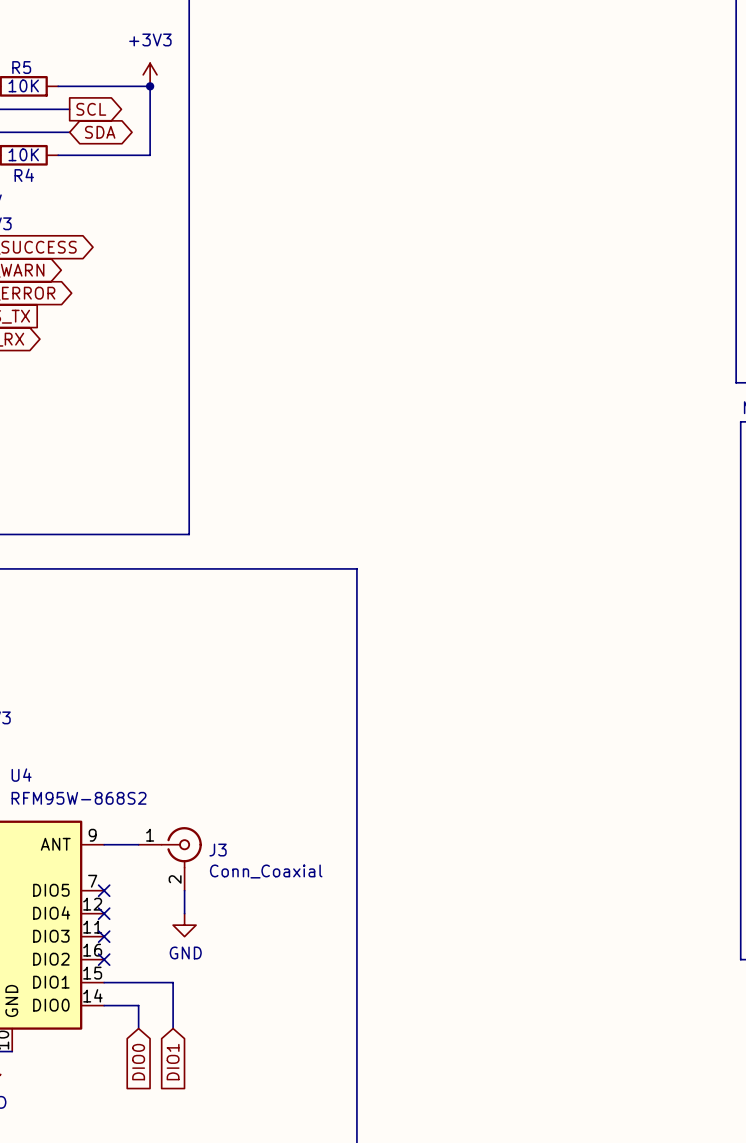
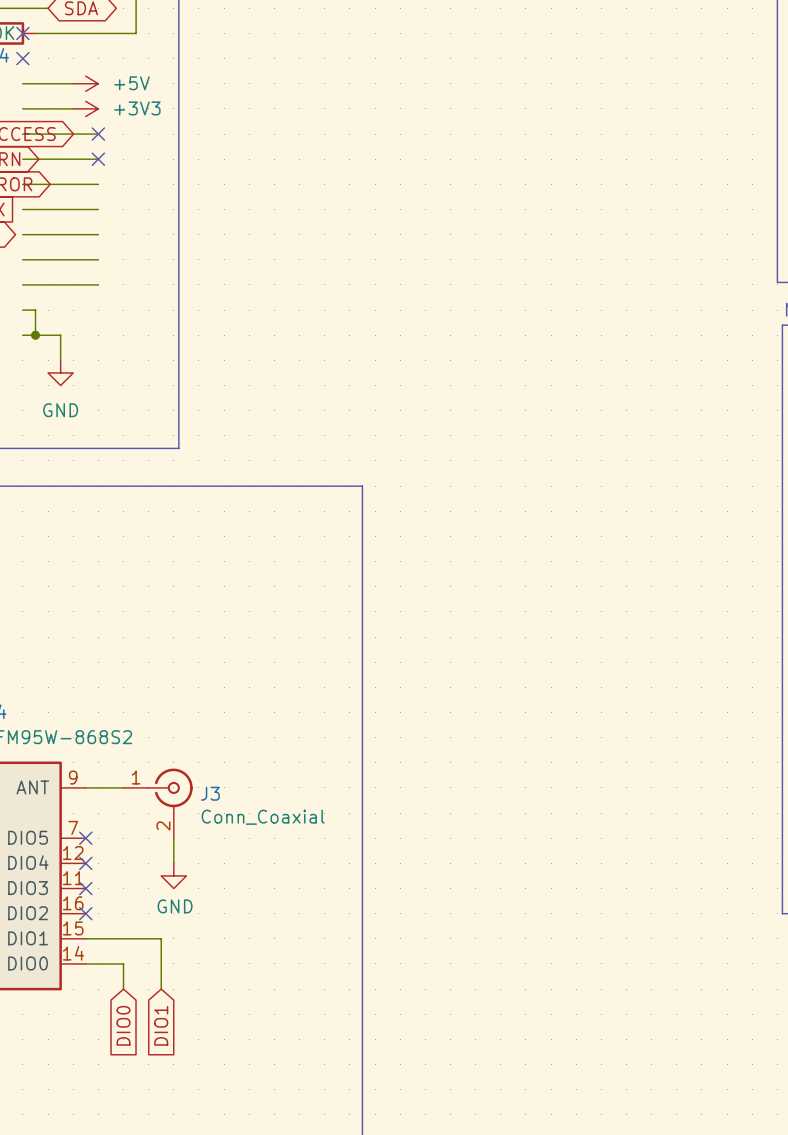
no-connect mark: none -> (22, 33)
no-connect mark: none -> (22, 58)
wire: none -> (22, 83) (73, 83)
power symbol: none -> +5V (85, 83)
wire: none -> (22, 108) (73, 108)
power symbol: none -> +3V3 (85, 108)
wire: none -> (22, 134) (98, 134)
no-connect mark: none -> (98, 134)
wire: none -> (22, 159) (98, 159)
no-connect mark: none -> (98, 159)
wire: none -> (22, 184) (98, 184)
wire: none -> (22, 209) (98, 209)
wire: none -> (22, 234) (98, 234)
wire: none -> (22, 259) (98, 259)
wire: none -> (22, 284) (98, 284)
wire: none -> (22, 310) (35, 310) (35, 335)
wire: none -> (22, 335) (60, 335) (60, 360)
junction: none -> (35, 335)
power symbol: none -> GND (60, 372)

